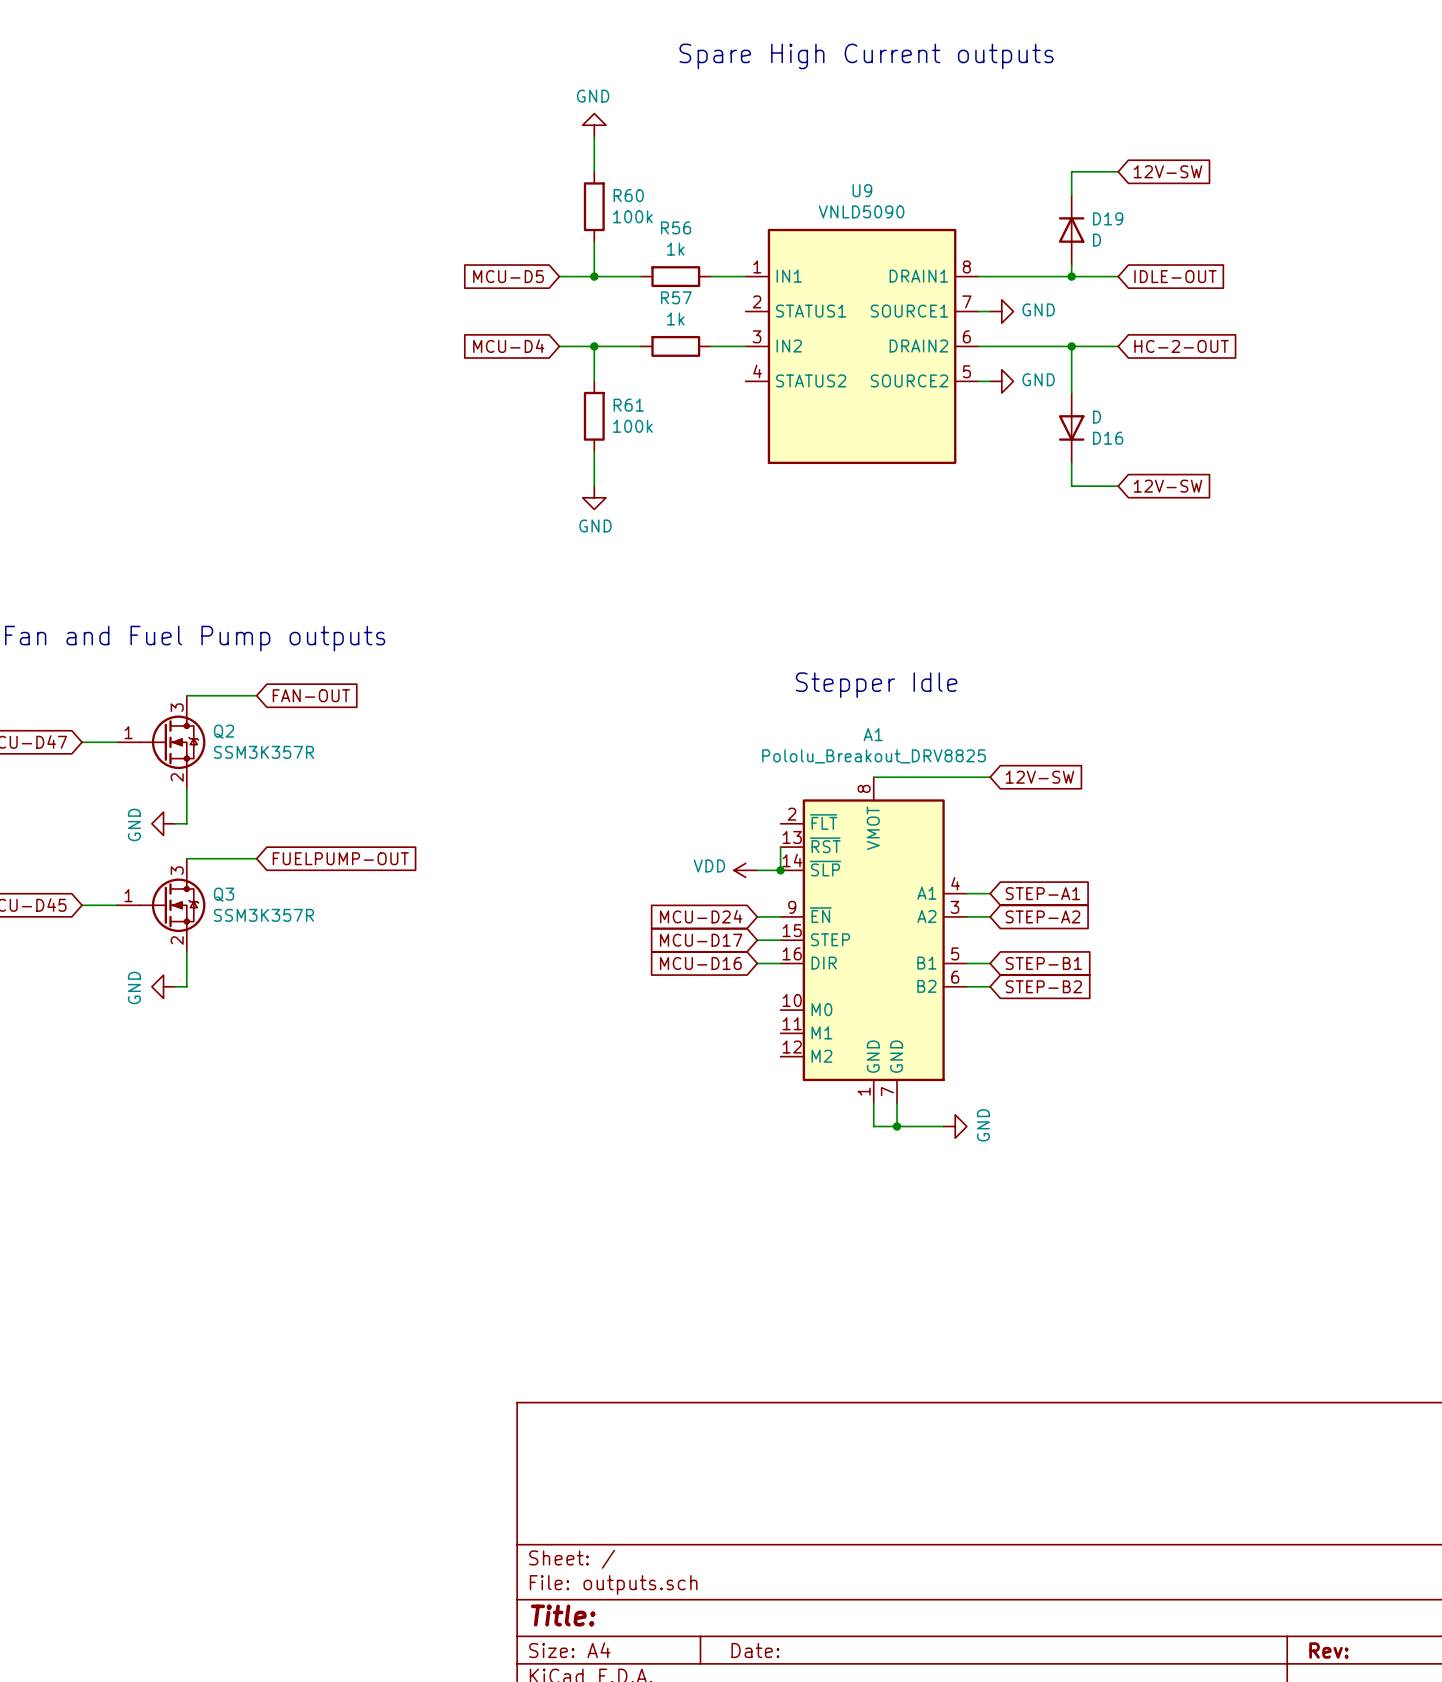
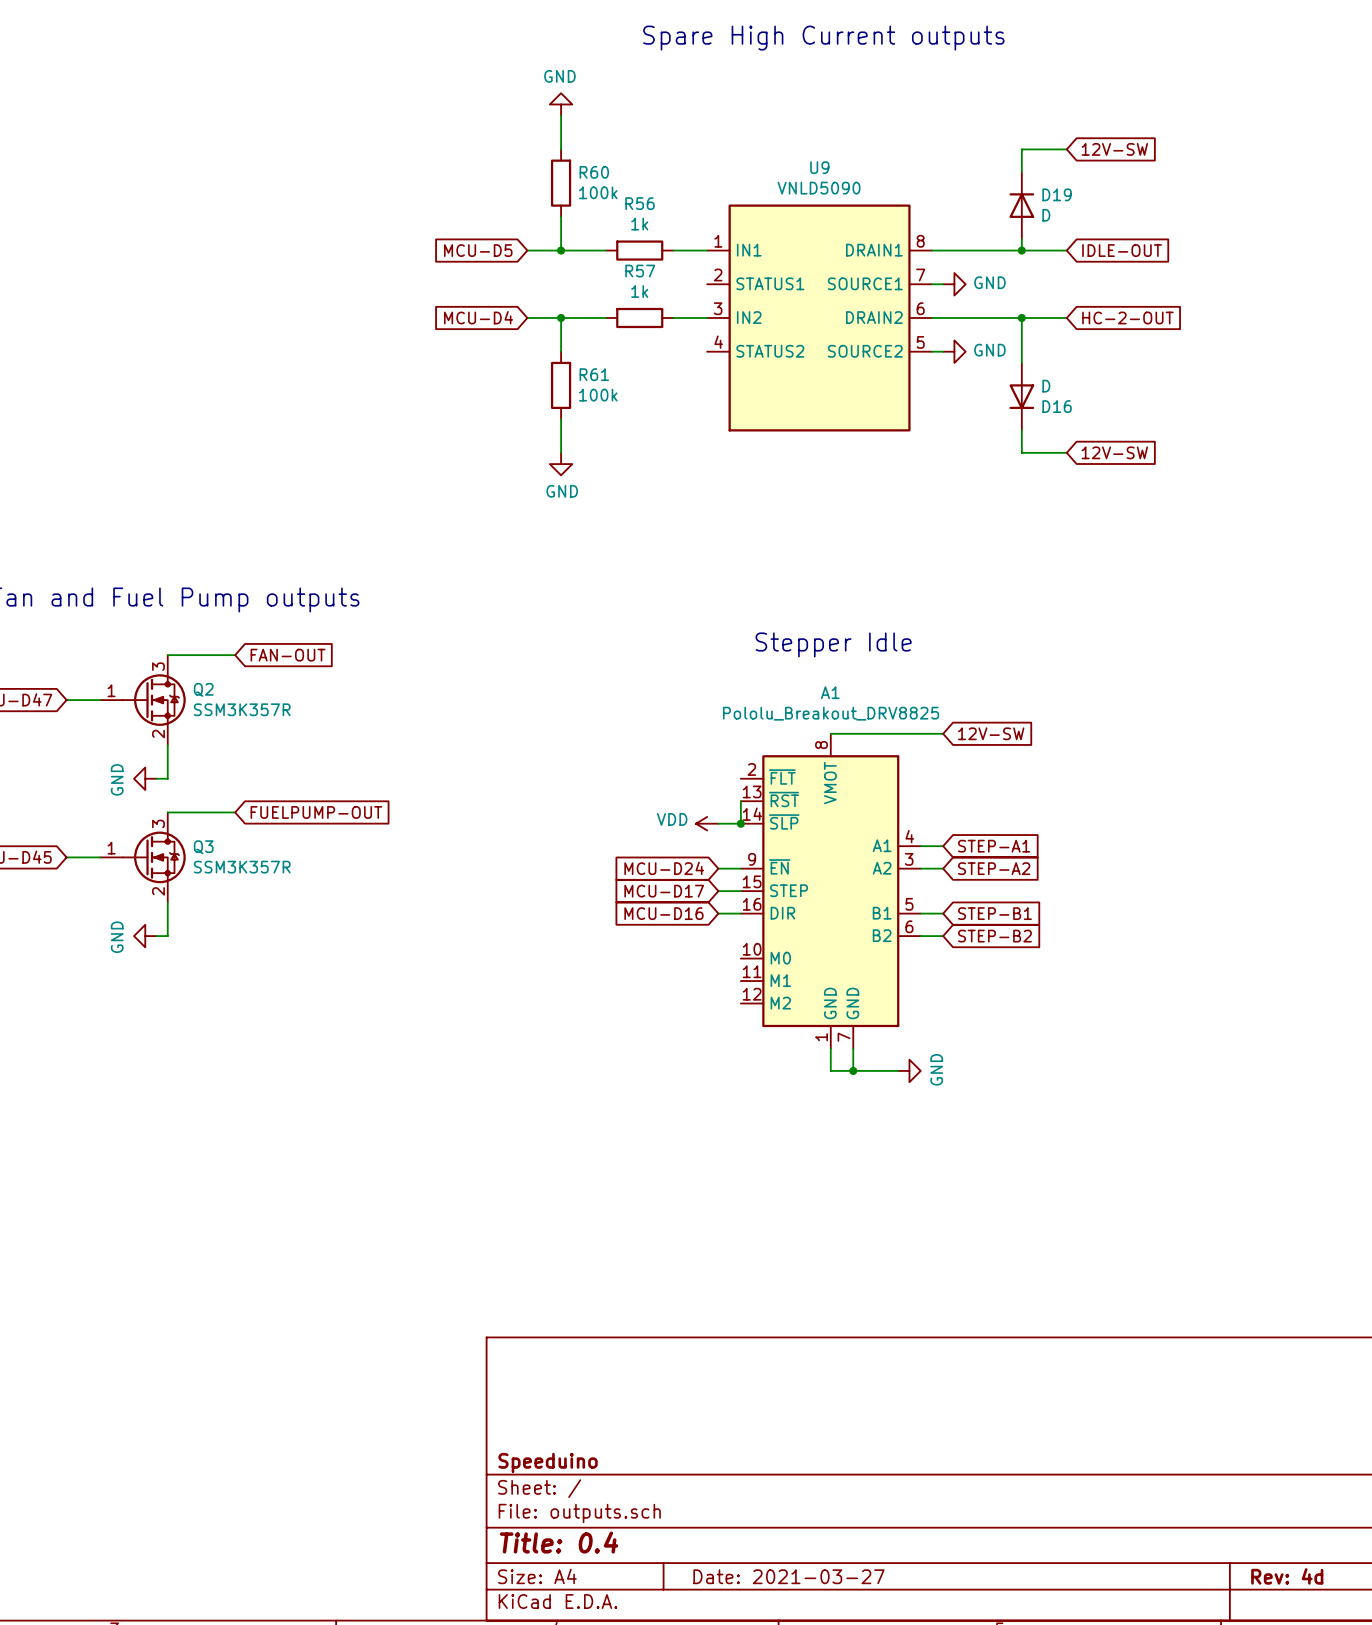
title block: none -> Speeduino (548, 1463)
title block: Title: (563, 1615) -> Title: 0.4 (559, 1542)
title block: Date: (755, 1650) -> Date: 2021-03-27 (788, 1576)
title block: Rev: (1328, 1650) -> Rev: 4d (1287, 1576)

